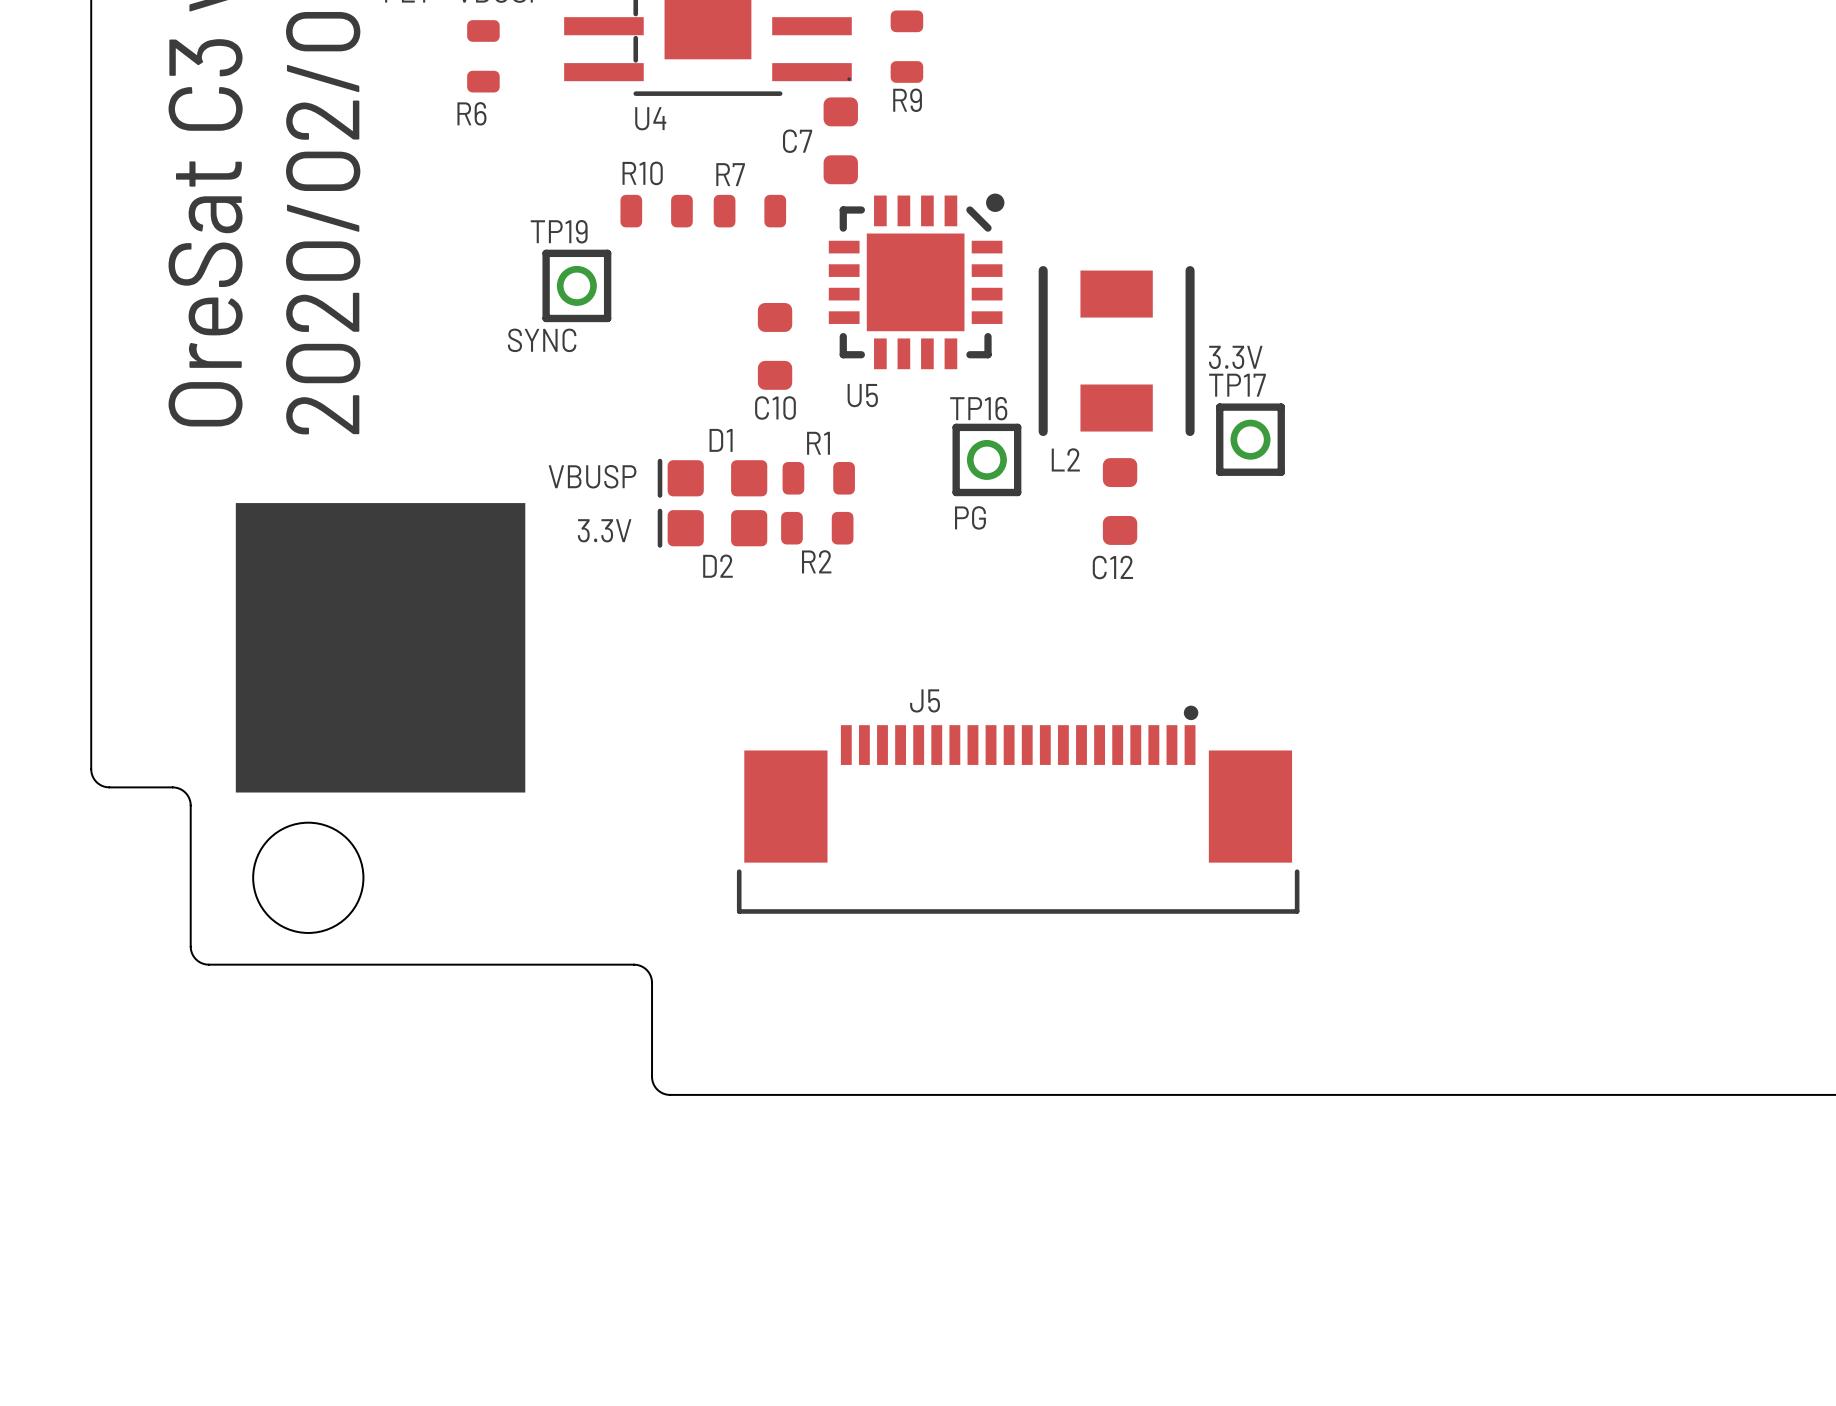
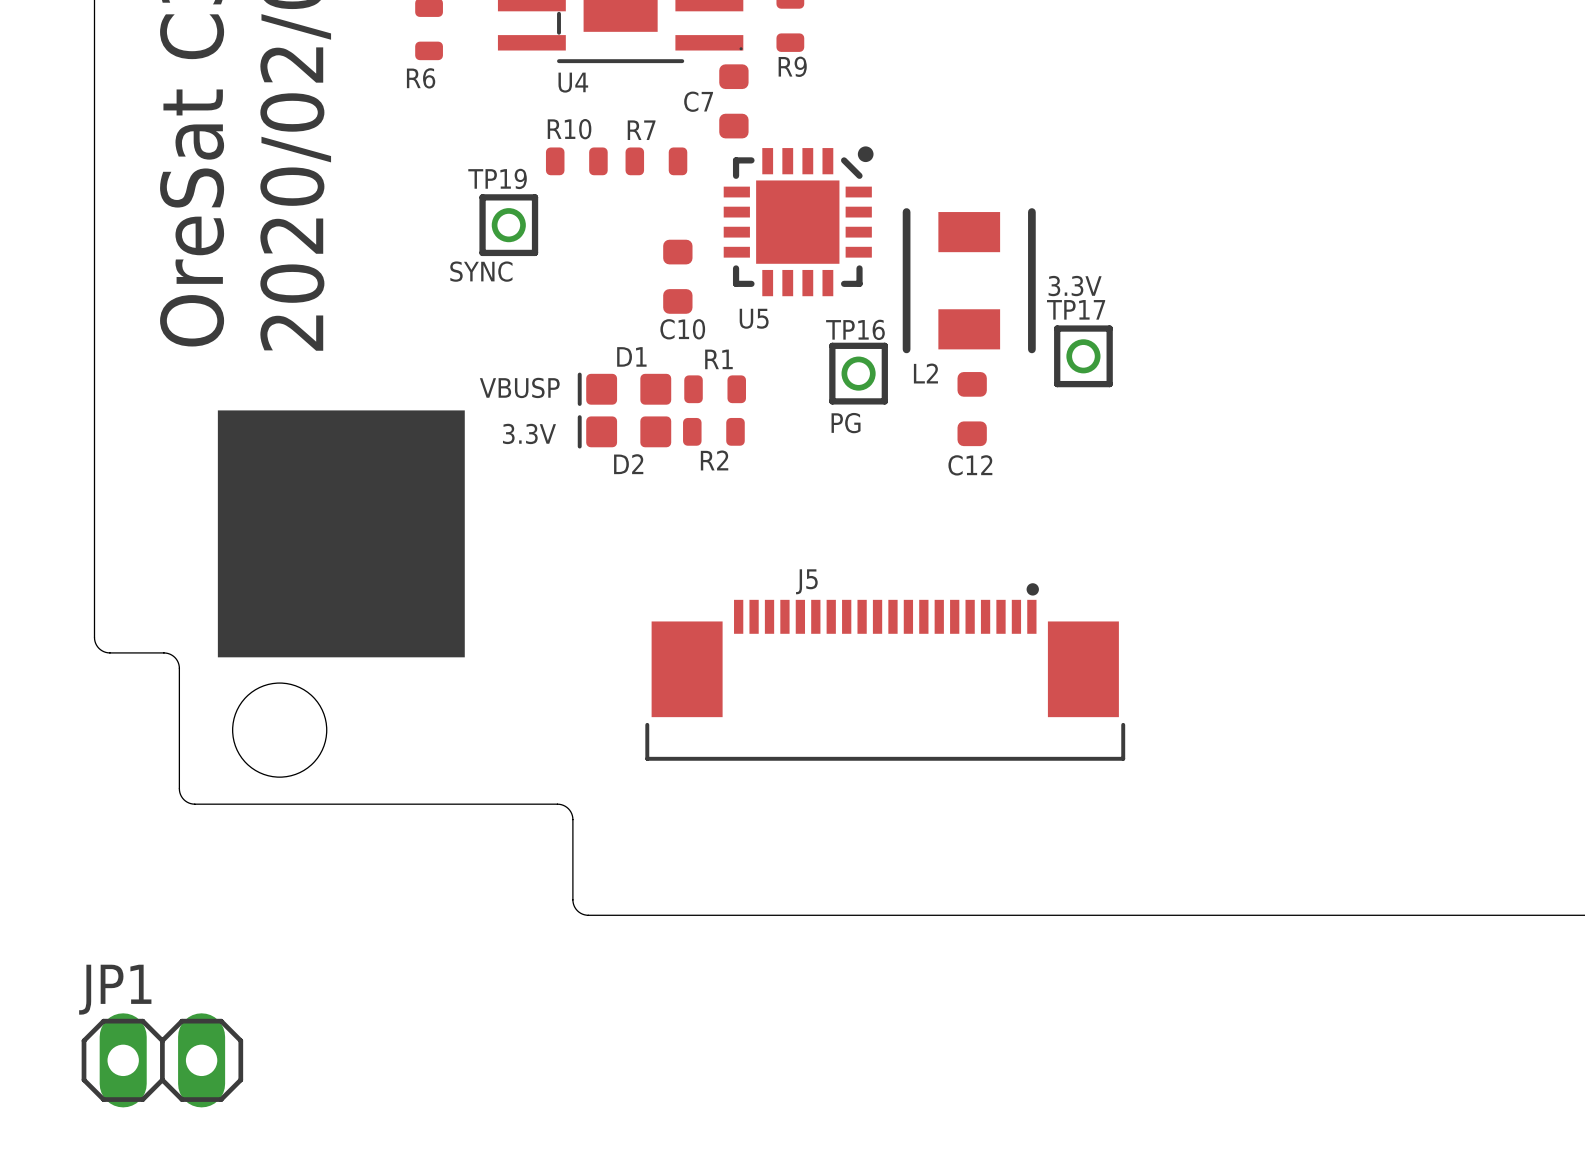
JP1: none -> (162, 1060)

